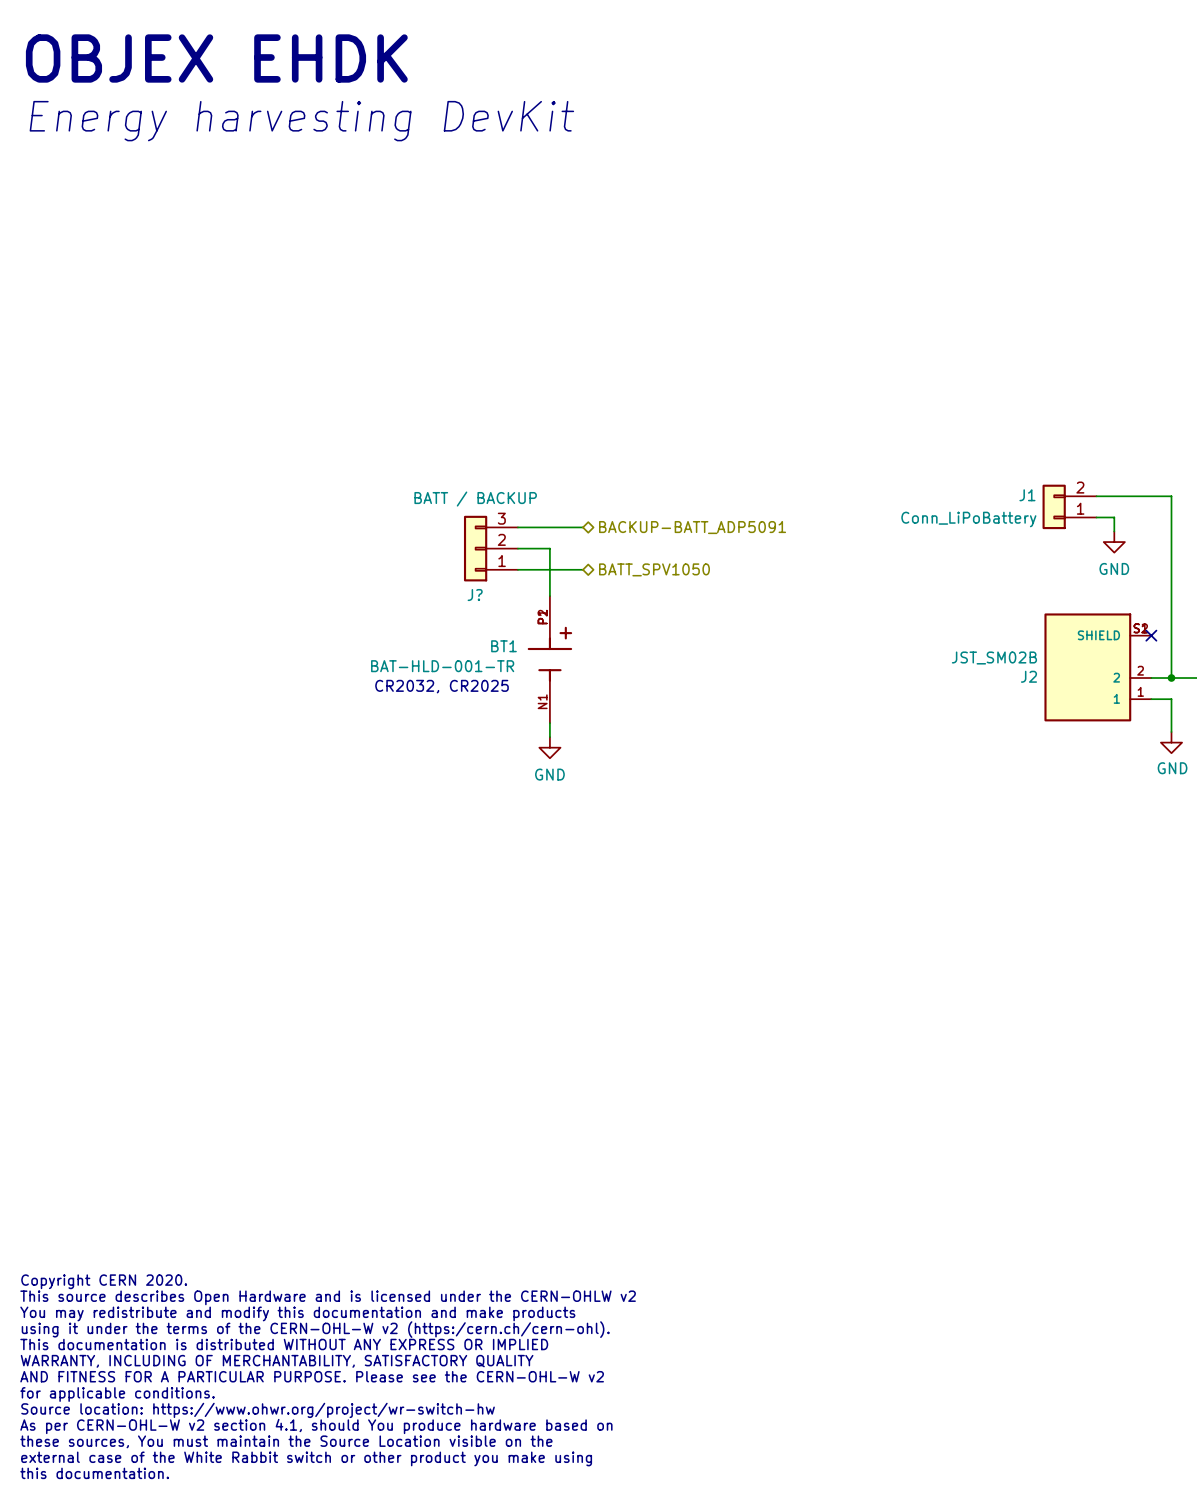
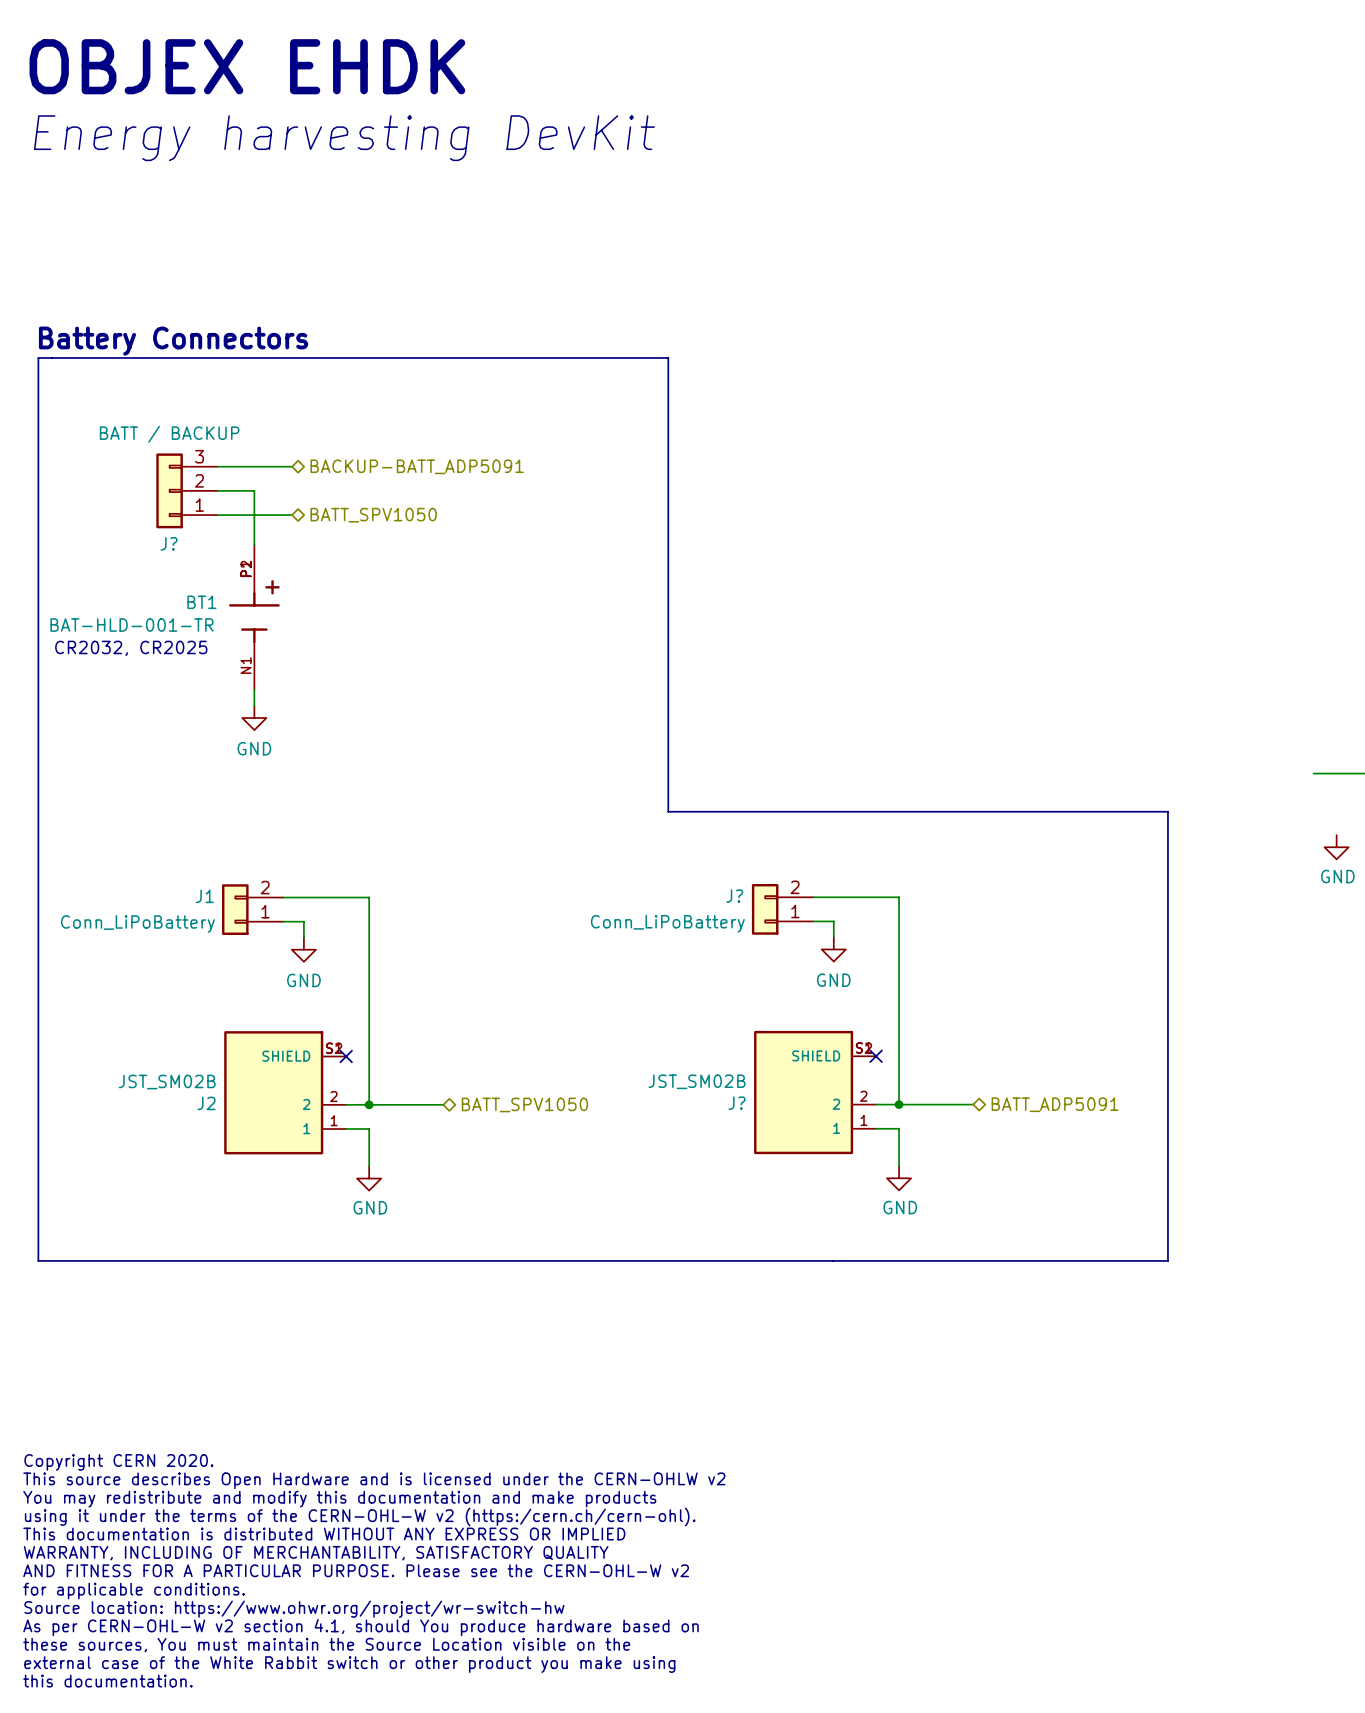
text: none -> Battery Connectors (173, 341)
line: none -> (38, 357) (668, 357) (668, 811) (1167, 811) (1167, 1260) (38, 1260) (38, 357)
wire: none -> (217, 466) (292, 466)
hierarchical label: none -> BACKUP-BATT_ADP5091 (417, 466)
J?: none -> BATT / BACKUP (187, 490)
wire: none -> (217, 490) (254, 490) (254, 545)
wire: none -> (217, 515) (292, 515)
hierarchical label: none -> BATT_SPV1050 (373, 515)
wire: (1096, 496) (1171, 496) (1171, 678) -> none
J1 position: (1069, 506) -> (252, 909)
wire: (1096, 517) (1114, 517) (1114, 531) -> none
wire: (517, 527) (582, 527) -> none
hierarchical label: BACKUP-BATT_ADP5091 (692, 527) -> none
power symbol: GND (1114, 542) -> none
J?: BATT / BACKUP (490, 548) -> none
wire: (517, 548) (549, 548) (549, 596) -> none
text: none -> CR2032, CR2025 (131, 648)
wire: (517, 569) (582, 569) -> none
hierarchical label: BATT_SPV1050 (654, 569) -> none
wire: none -> (254, 689) (254, 705)
power symbol: none -> GND (254, 718)
no-connect mark: (1151, 635) -> none
BT1 position: (549, 659) -> (254, 617)
J2 position: (1097, 667) -> (285, 1092)
junction: (1171, 678) -> none
text: CR2032, CR2025 (442, 686) -> none
wire: (1151, 699) (1171, 699) (1171, 732) -> none
wire: (549, 723) (549, 737) -> none
power symbol: GND (549, 747) -> none
wire: none -> (283, 897) (369, 897) (369, 1104)
wire: none -> (813, 897) (899, 897) (899, 1104)
J?: none -> Conn_LiPoBattery (782, 909)
wire: none -> (283, 921) (303, 921) (303, 937)
wire: none -> (813, 921) (833, 921) (833, 937)
power symbol: none -> GND (303, 949)
power symbol: none -> GND (833, 949)
no-connect mark: none -> (346, 1056)
no-connect mark: none -> (876, 1056)
J?: none -> JST_SM02B (815, 1092)
wire: none -> (346, 1104) (443, 1104)
junction: none -> (369, 1104)
hierarchical label: none -> BATT_SPV1050 (524, 1104)
wire: none -> (876, 1104) (973, 1104)
junction: none -> (899, 1104)
hierarchical label: none -> BATT_ADP5091 (1055, 1104)
wire: none -> (346, 1129) (369, 1129) (369, 1166)
wire: none -> (876, 1128) (899, 1128) (899, 1166)
power symbol: none -> GND (369, 1178)
power symbol: none -> GND (899, 1178)

